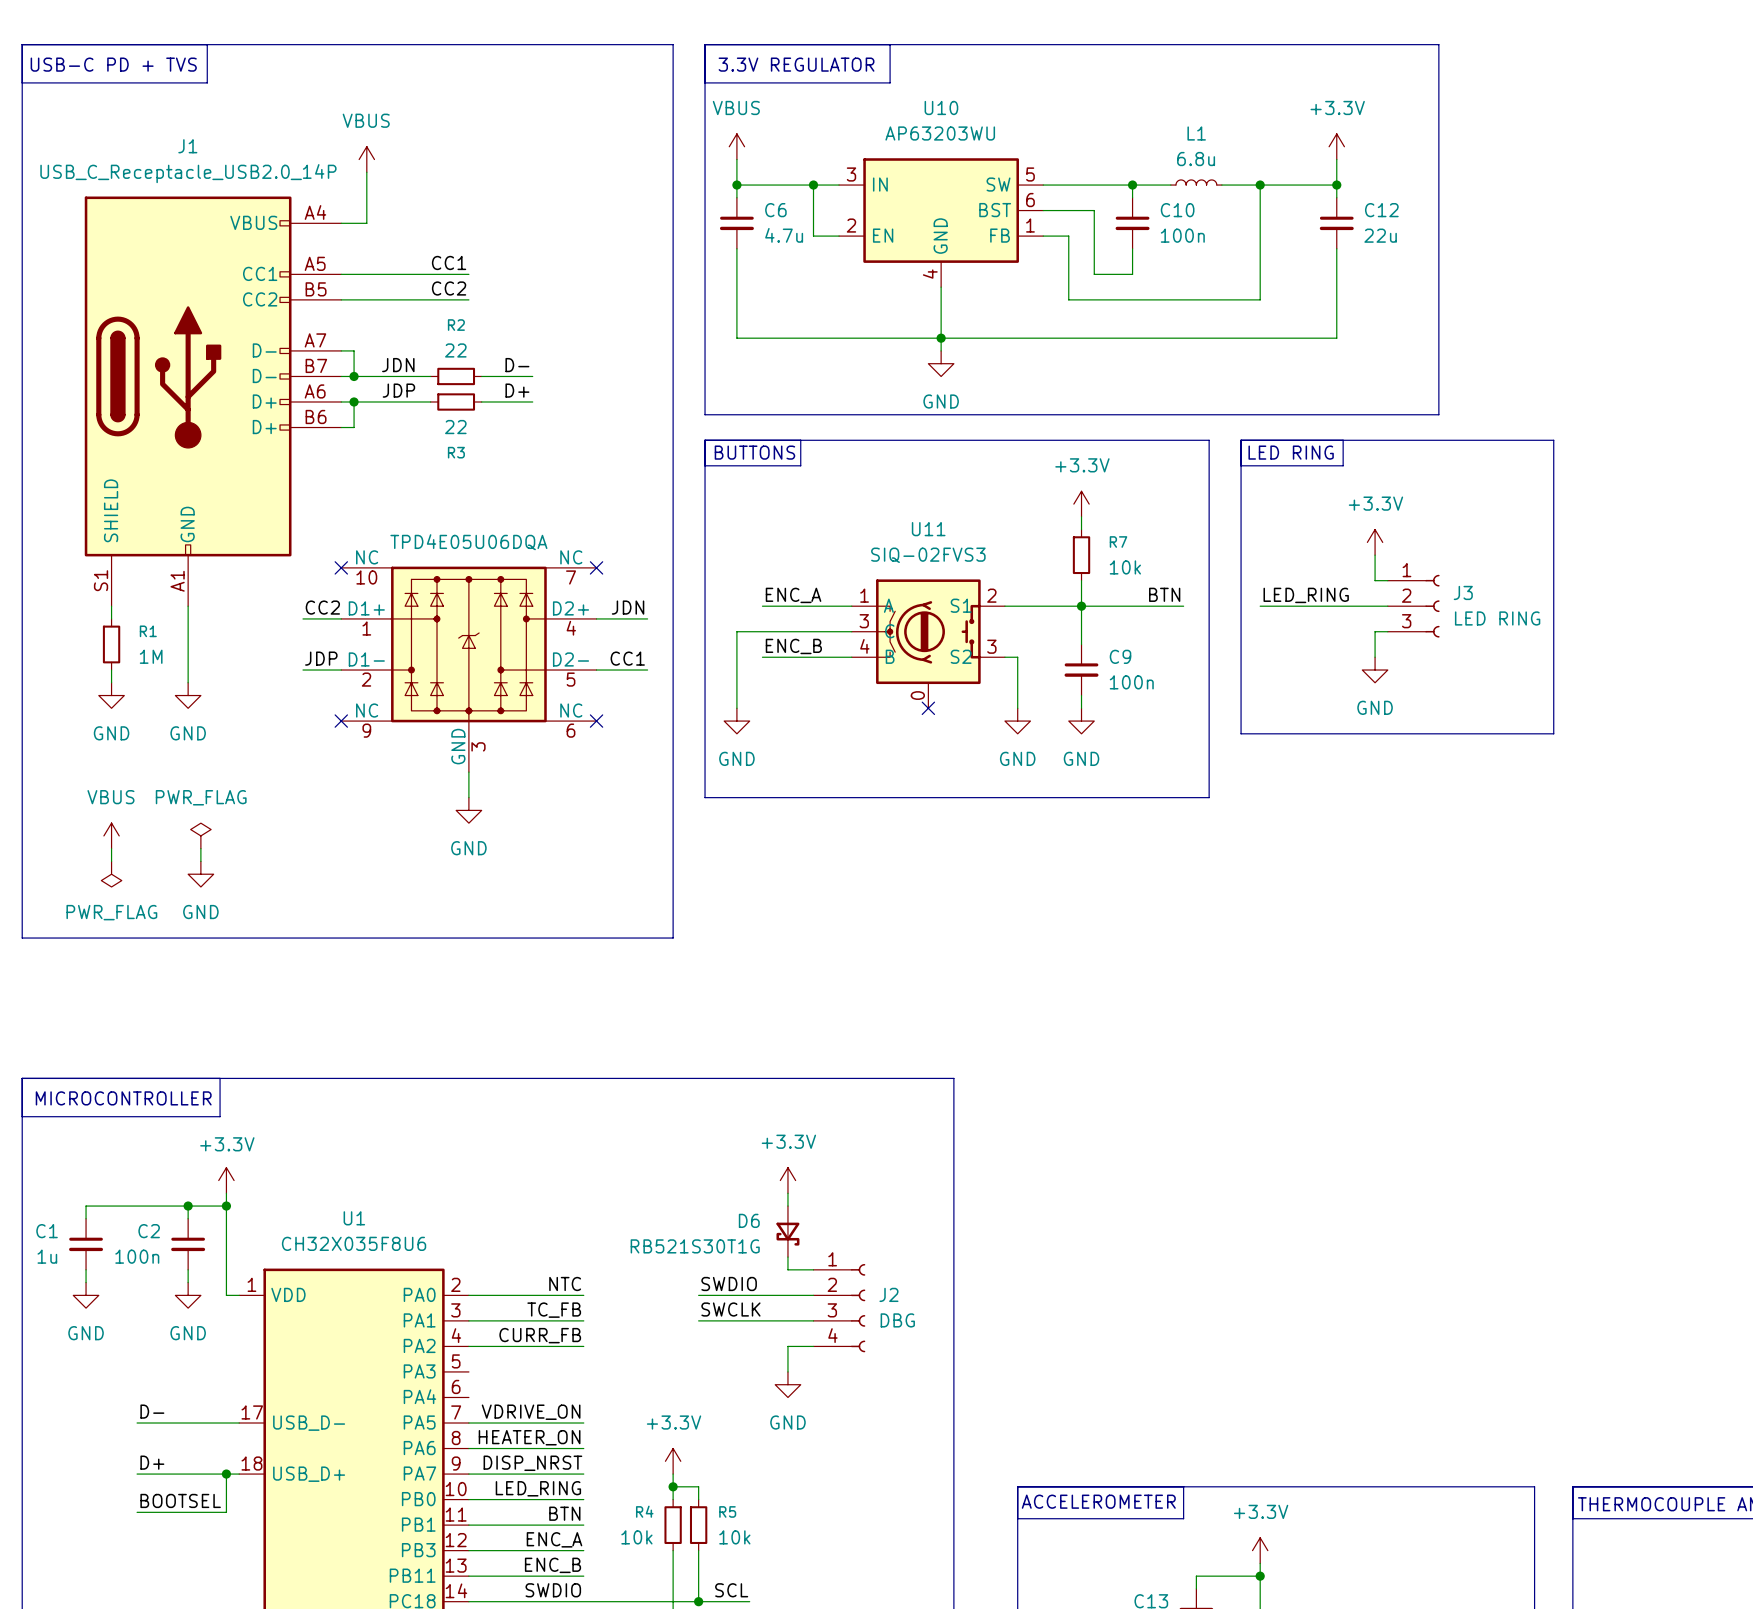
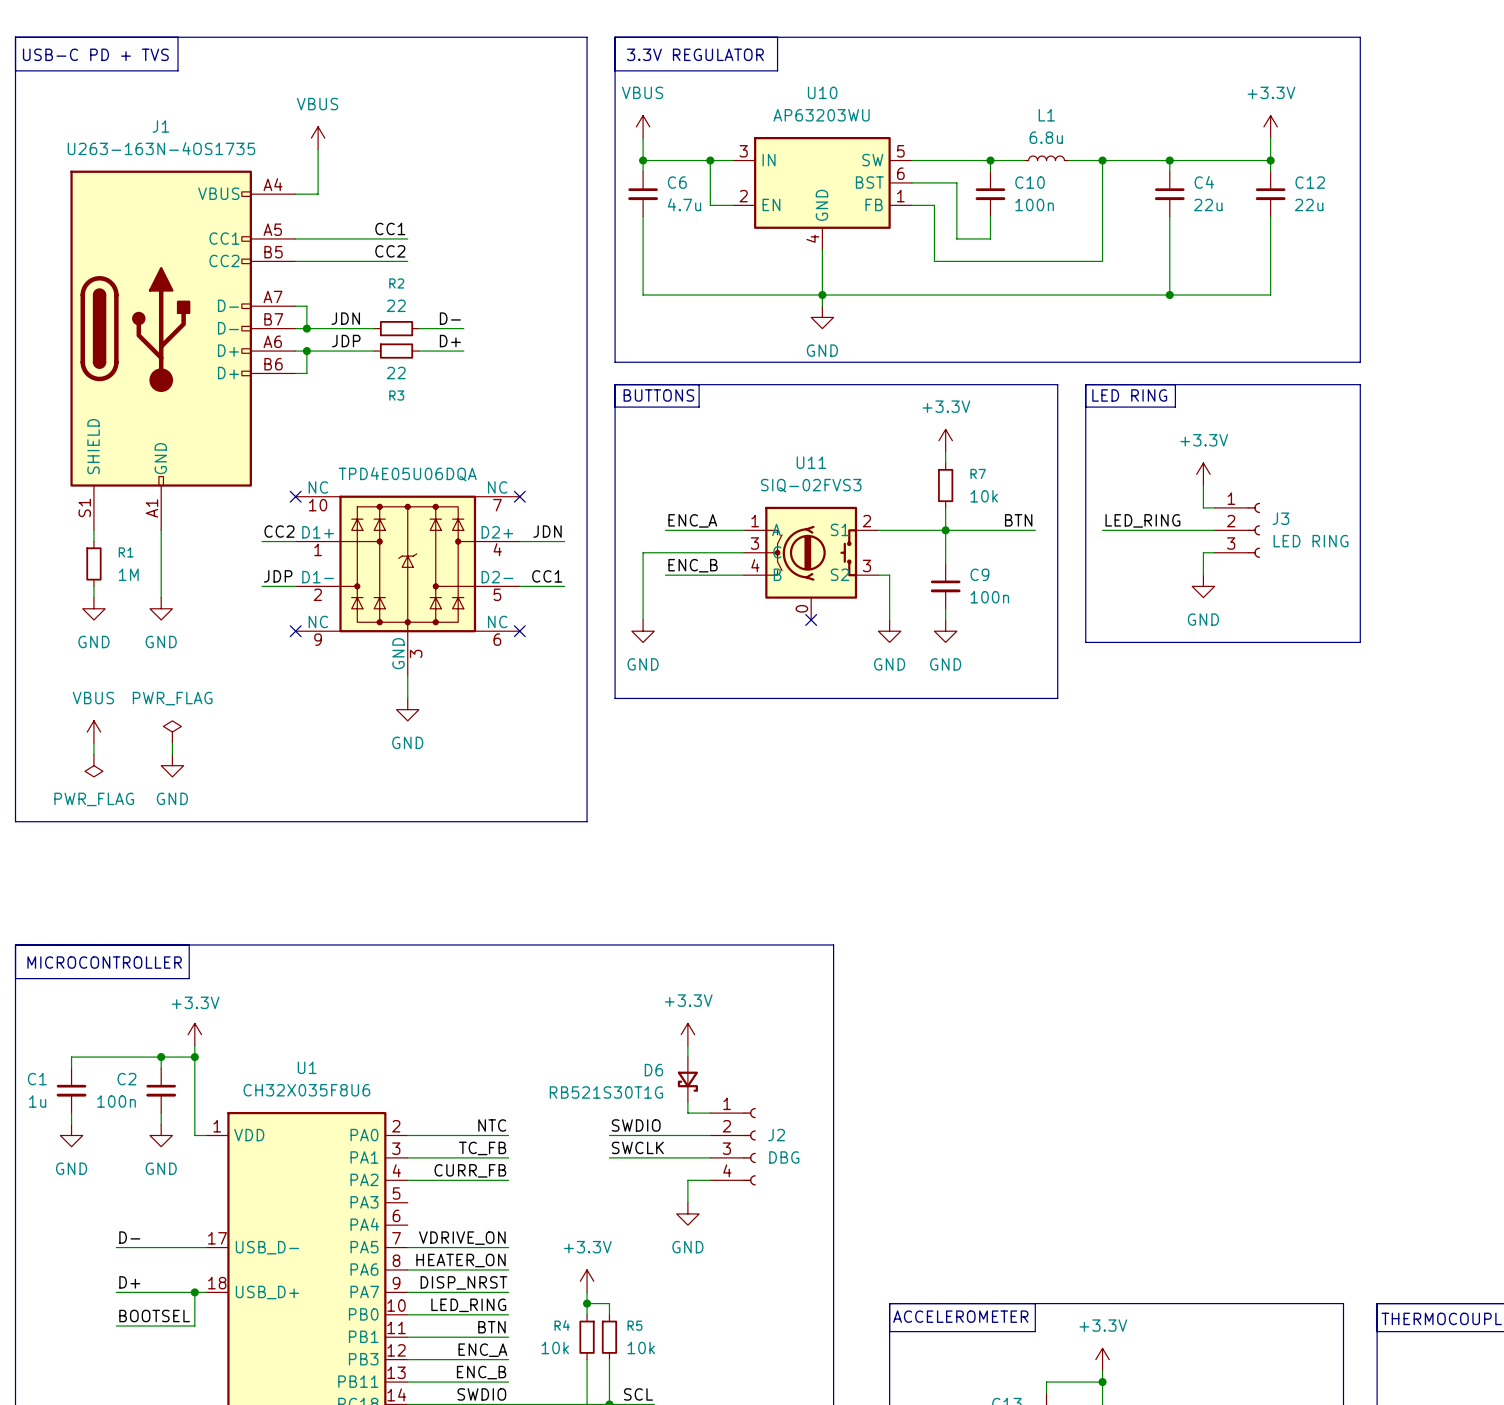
line: (1438, 44) (1438, 414) -> (1259, 37) (1360, 37) (1360, 362) (1259, 362)
power symbol position: +3.3V (1336, 146) -> +3.3V (1270, 126)
wire: (1336, 159) (1336, 185) -> (1270, 160) (1169, 160)
wire: none -> (1270, 138) (1270, 171)
J1 value: USB_C_Receptacle_USB2.0_14P (188, 173) -> U263-163N-4OS1735 (161, 148)
junction: none -> (1270, 160)
C12 name: C12 (1381, 210) -> C4 (1204, 182)
C12: none -> 22u (1270, 194)
wire: none -> (1270, 216) (1270, 295) (1169, 295)
junction: none -> (1169, 295)

